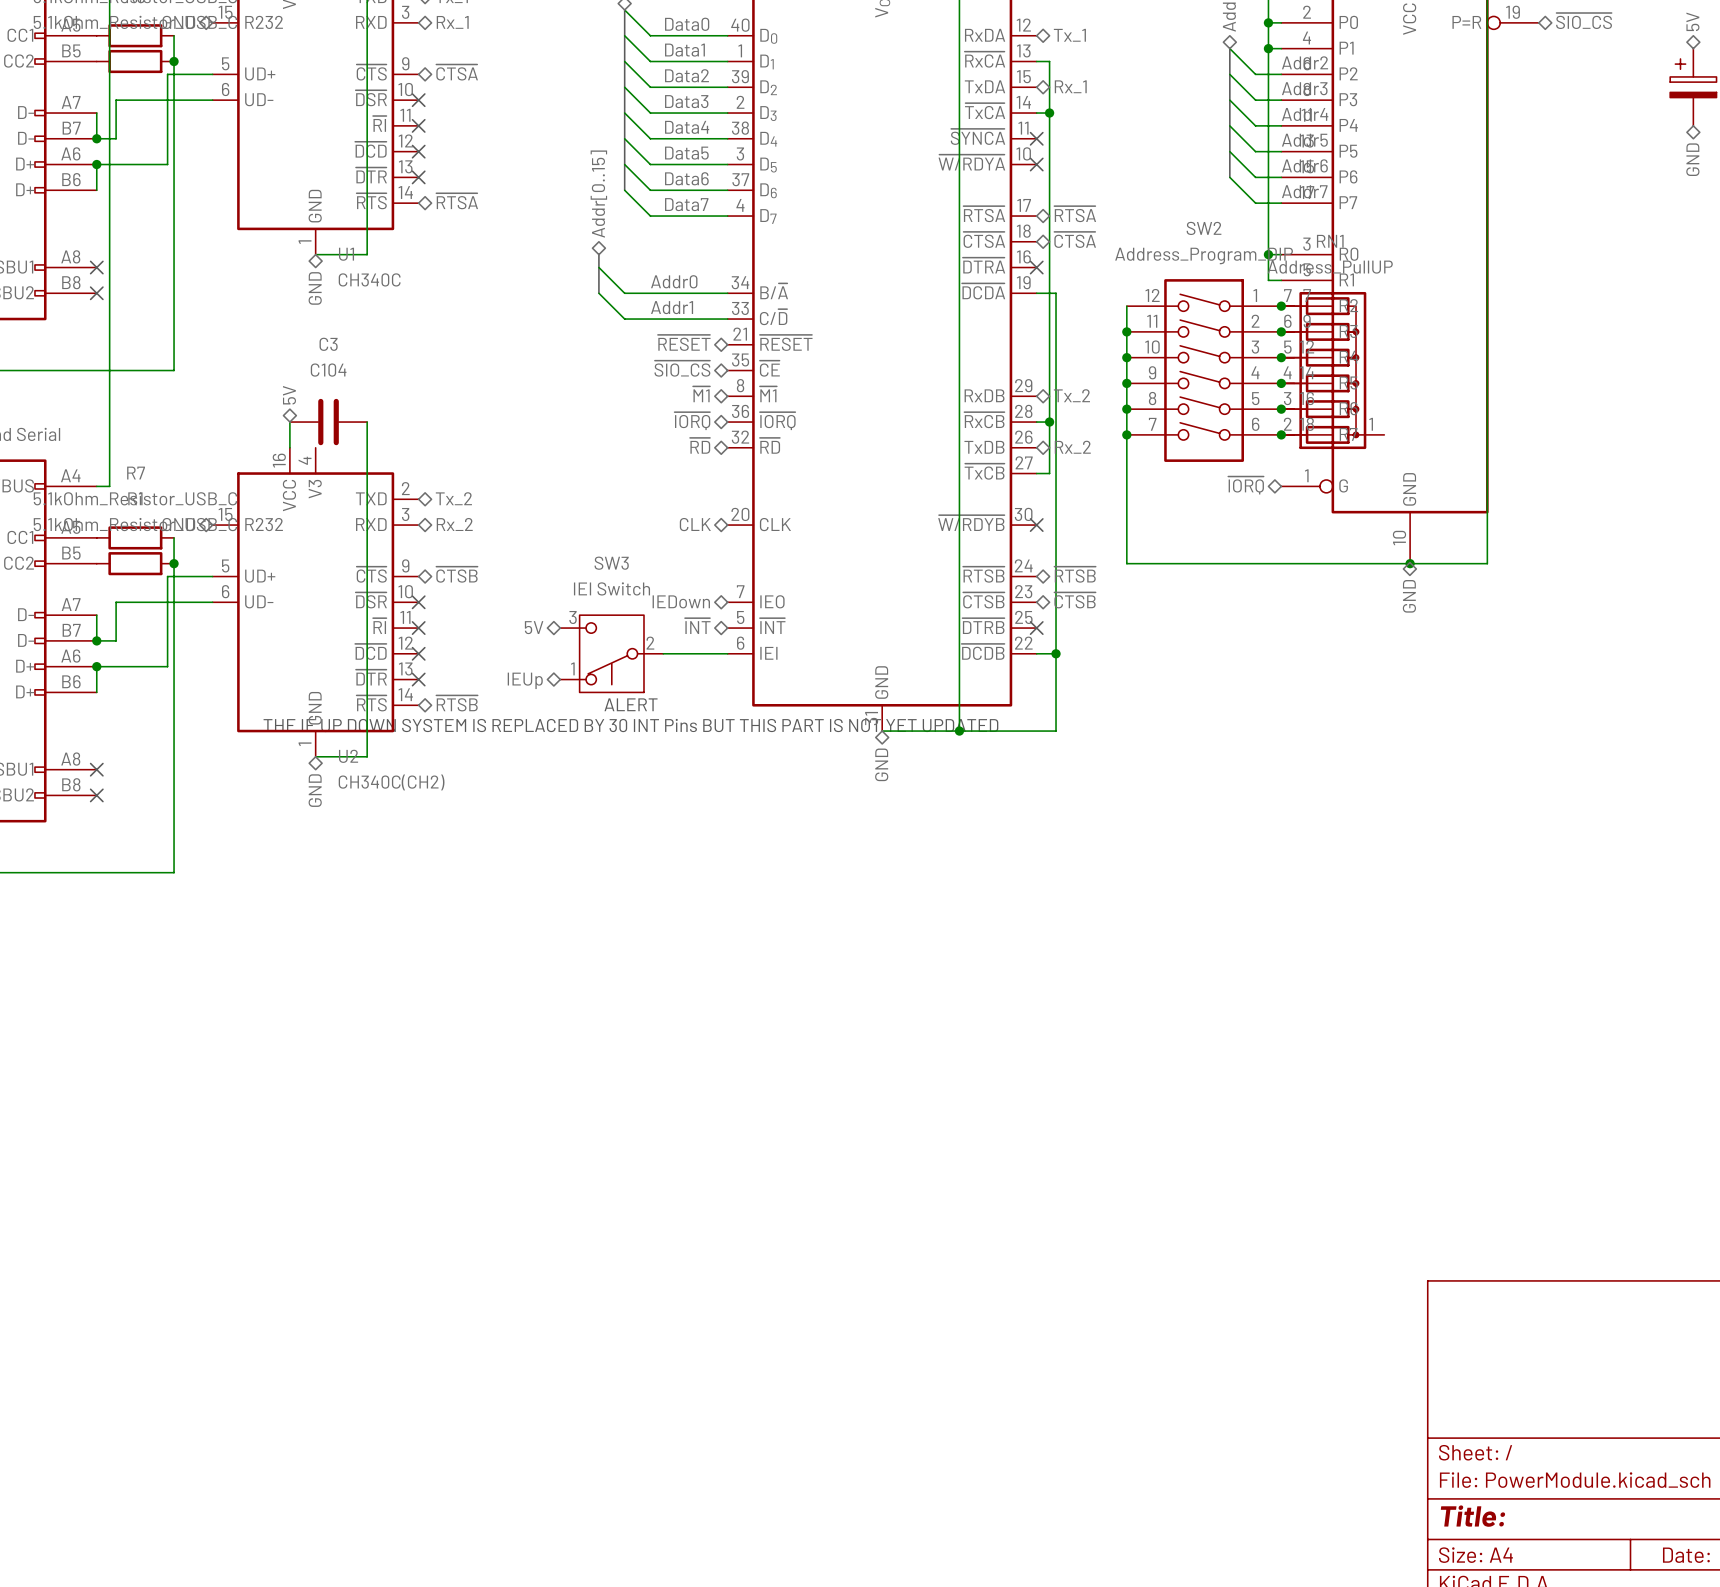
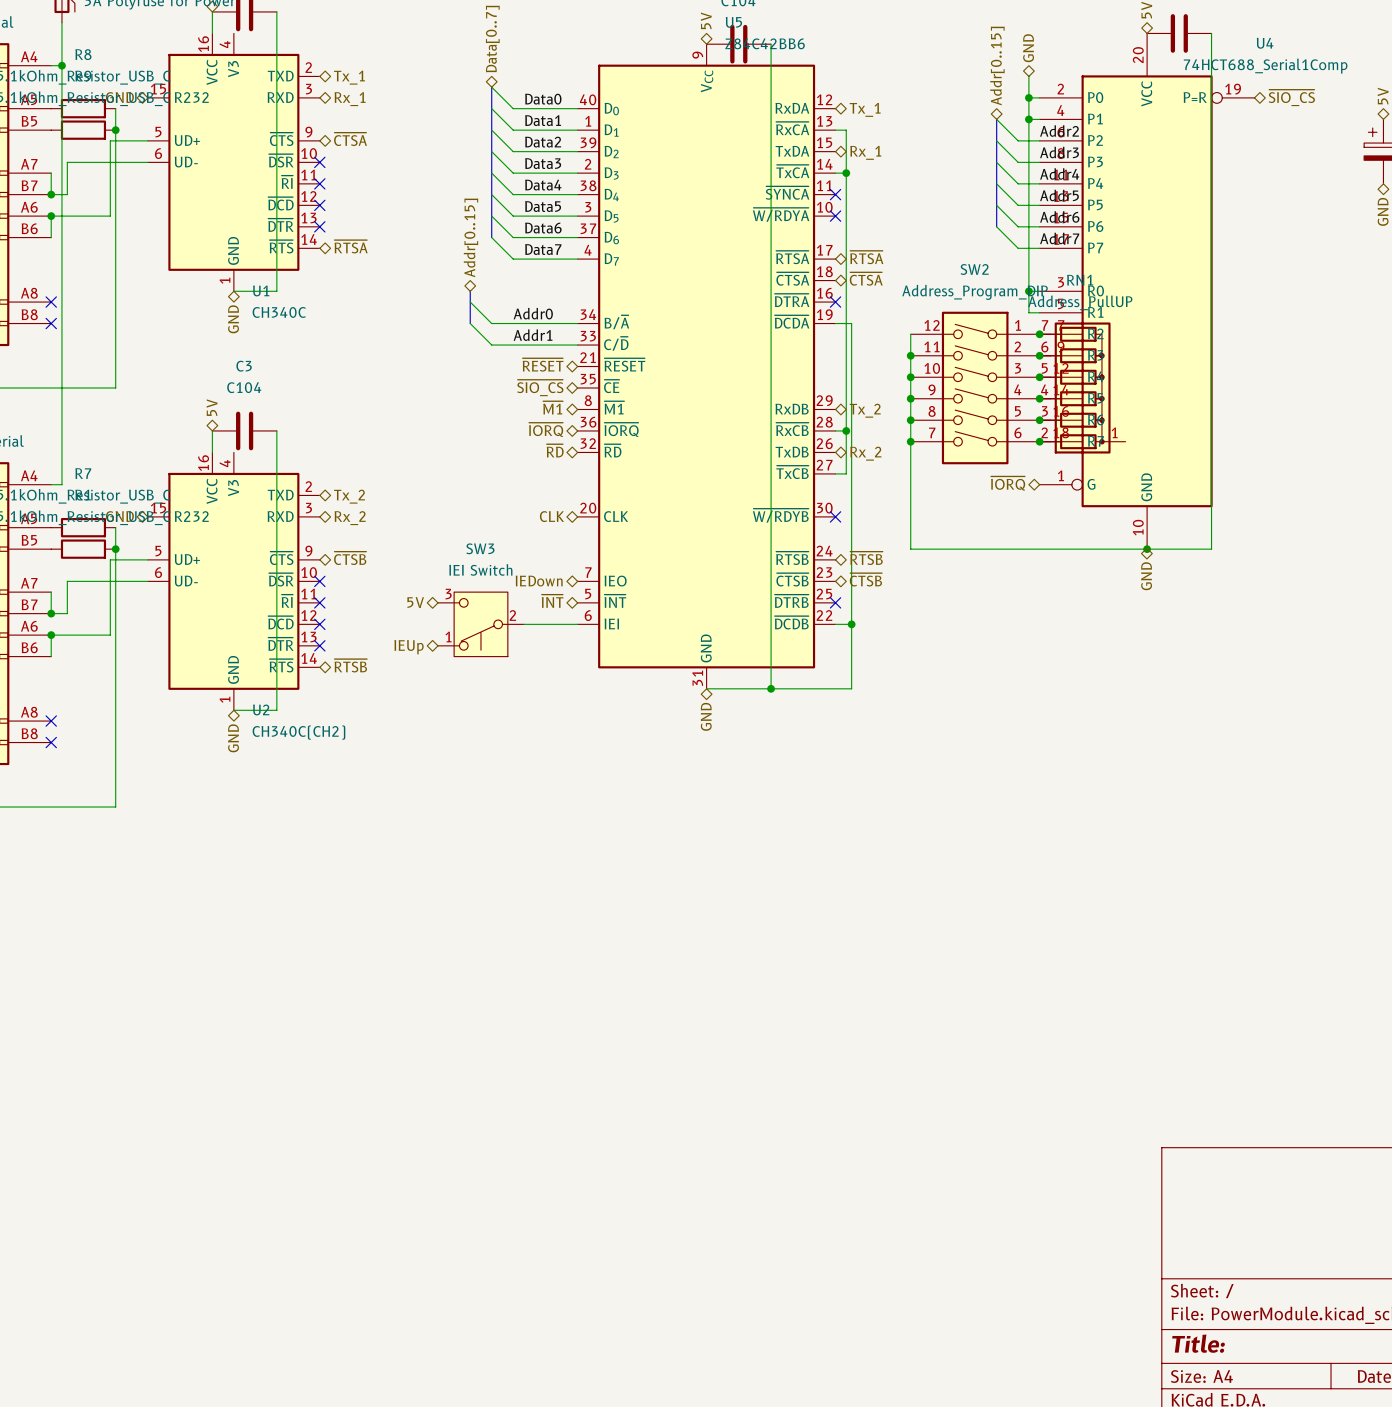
text: ALERT (631, 704) -> none
text: THE IE UP DOWN SYSTEM IS REPLACED BY 30 INT Pins BUT THIS PART IS NOT YET UPDATED (630, 725) -> none

